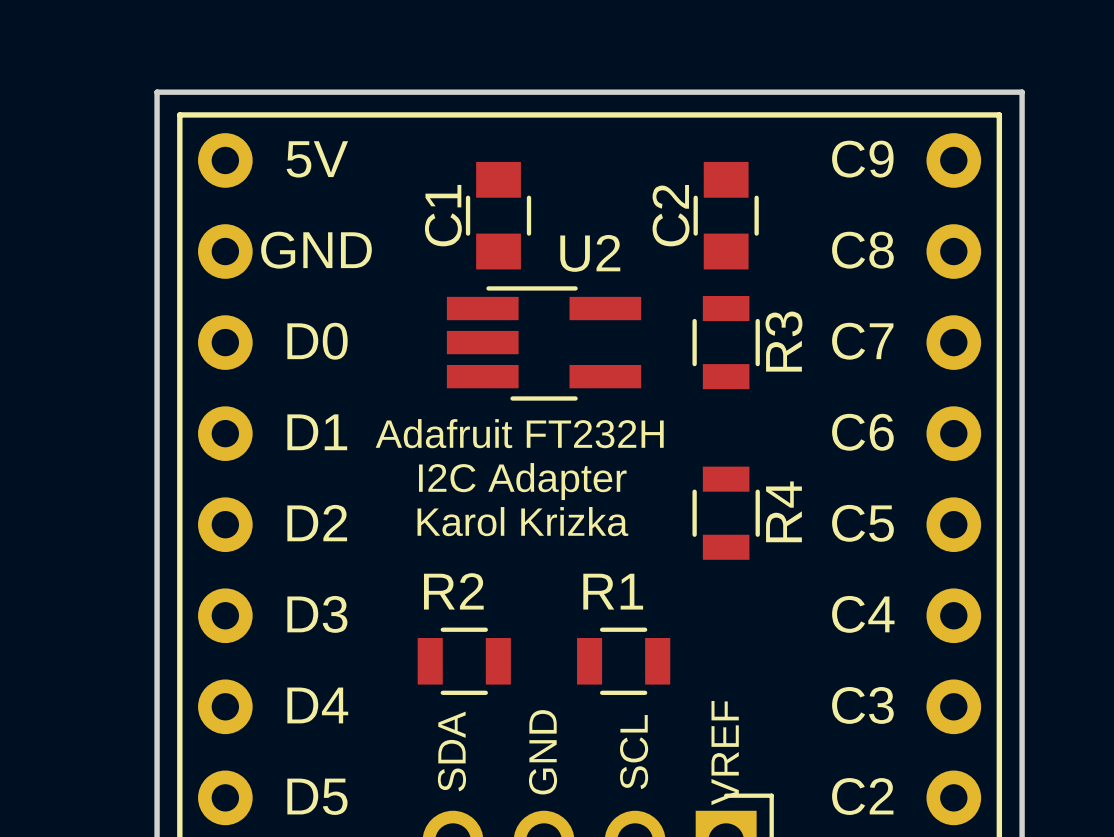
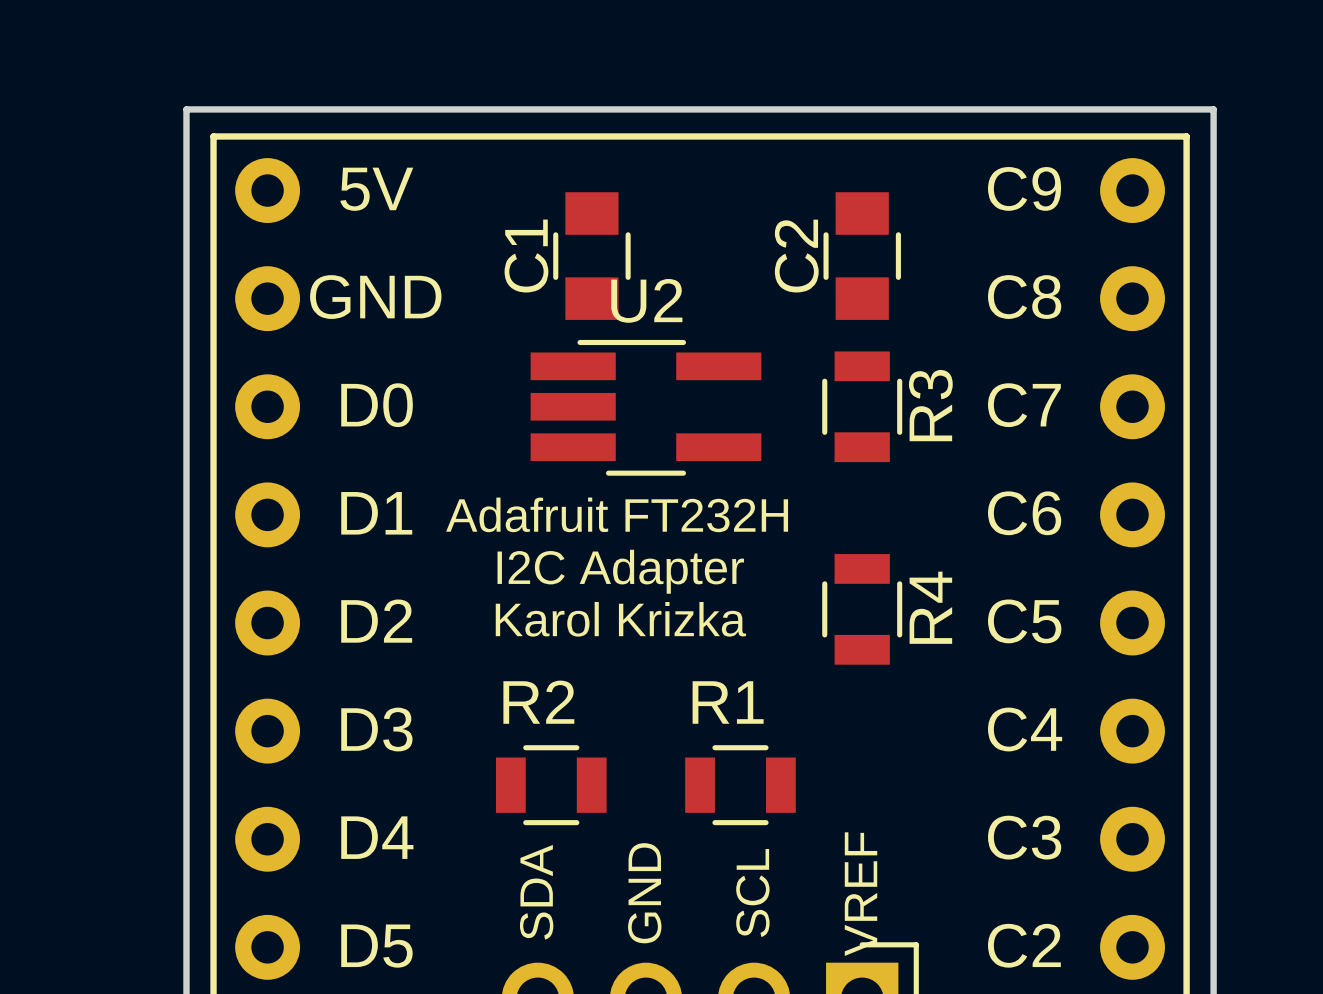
U2 name position: U2 (590, 253) -> U2 (646, 300)

